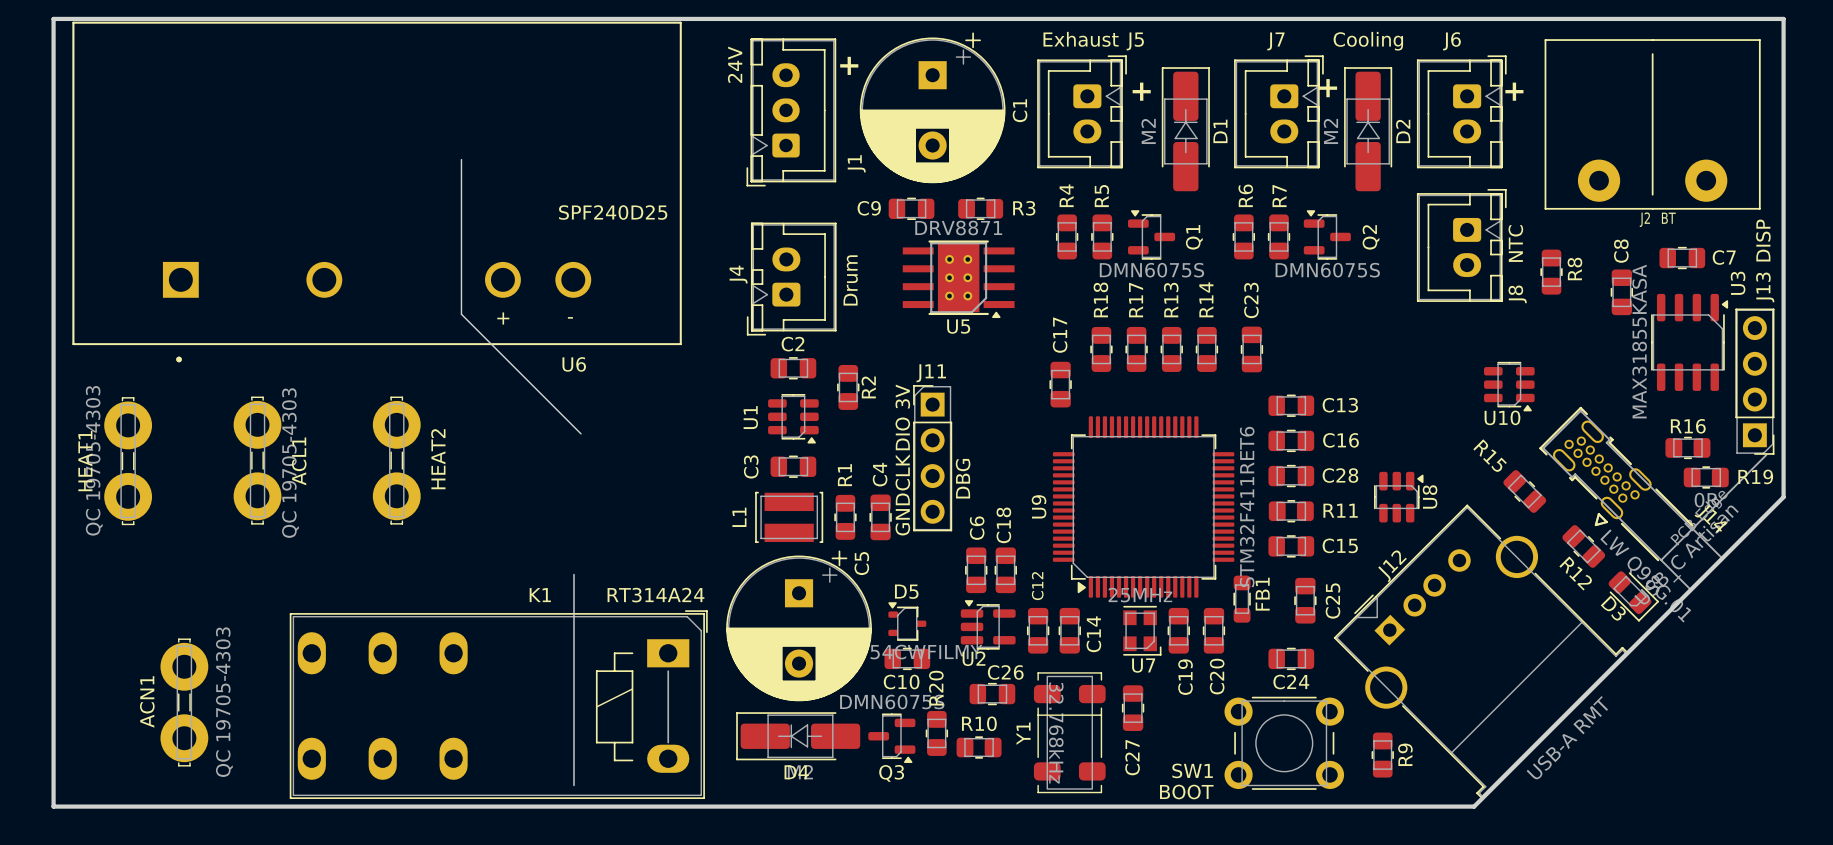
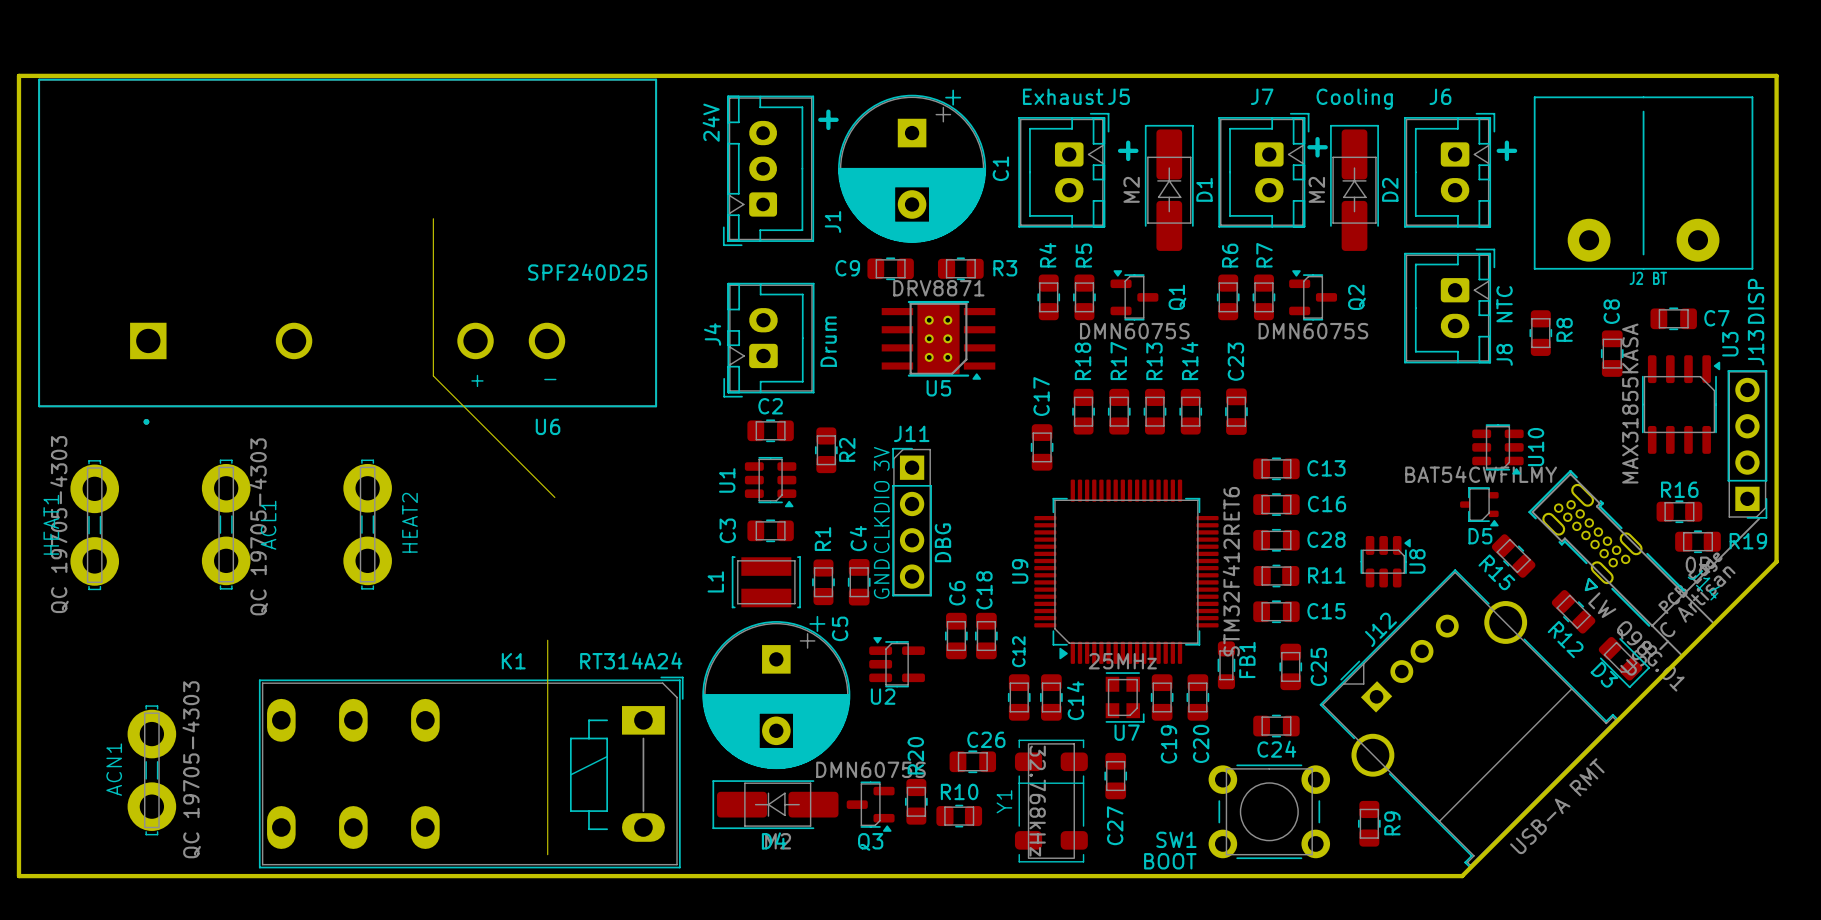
U10 name rotation: 0° (1502, 417) -> 90° counterclockwise (1535, 447)
U10 name position: U10 (1502, 417) -> U10 (1535, 447)
R15 name position: R15 (1490, 455) -> R15 (1496, 572)
U9 value: STM32F411RET6 (1247, 506) -> STM32F412RET6 (1231, 571)
D5 rotation: 0° (907, 621) -> 180° (1479, 506)
D5 position: (907, 621) -> (1479, 506)
U2 position: (988, 624) -> (897, 662)
C10: (907, 658) -> none

